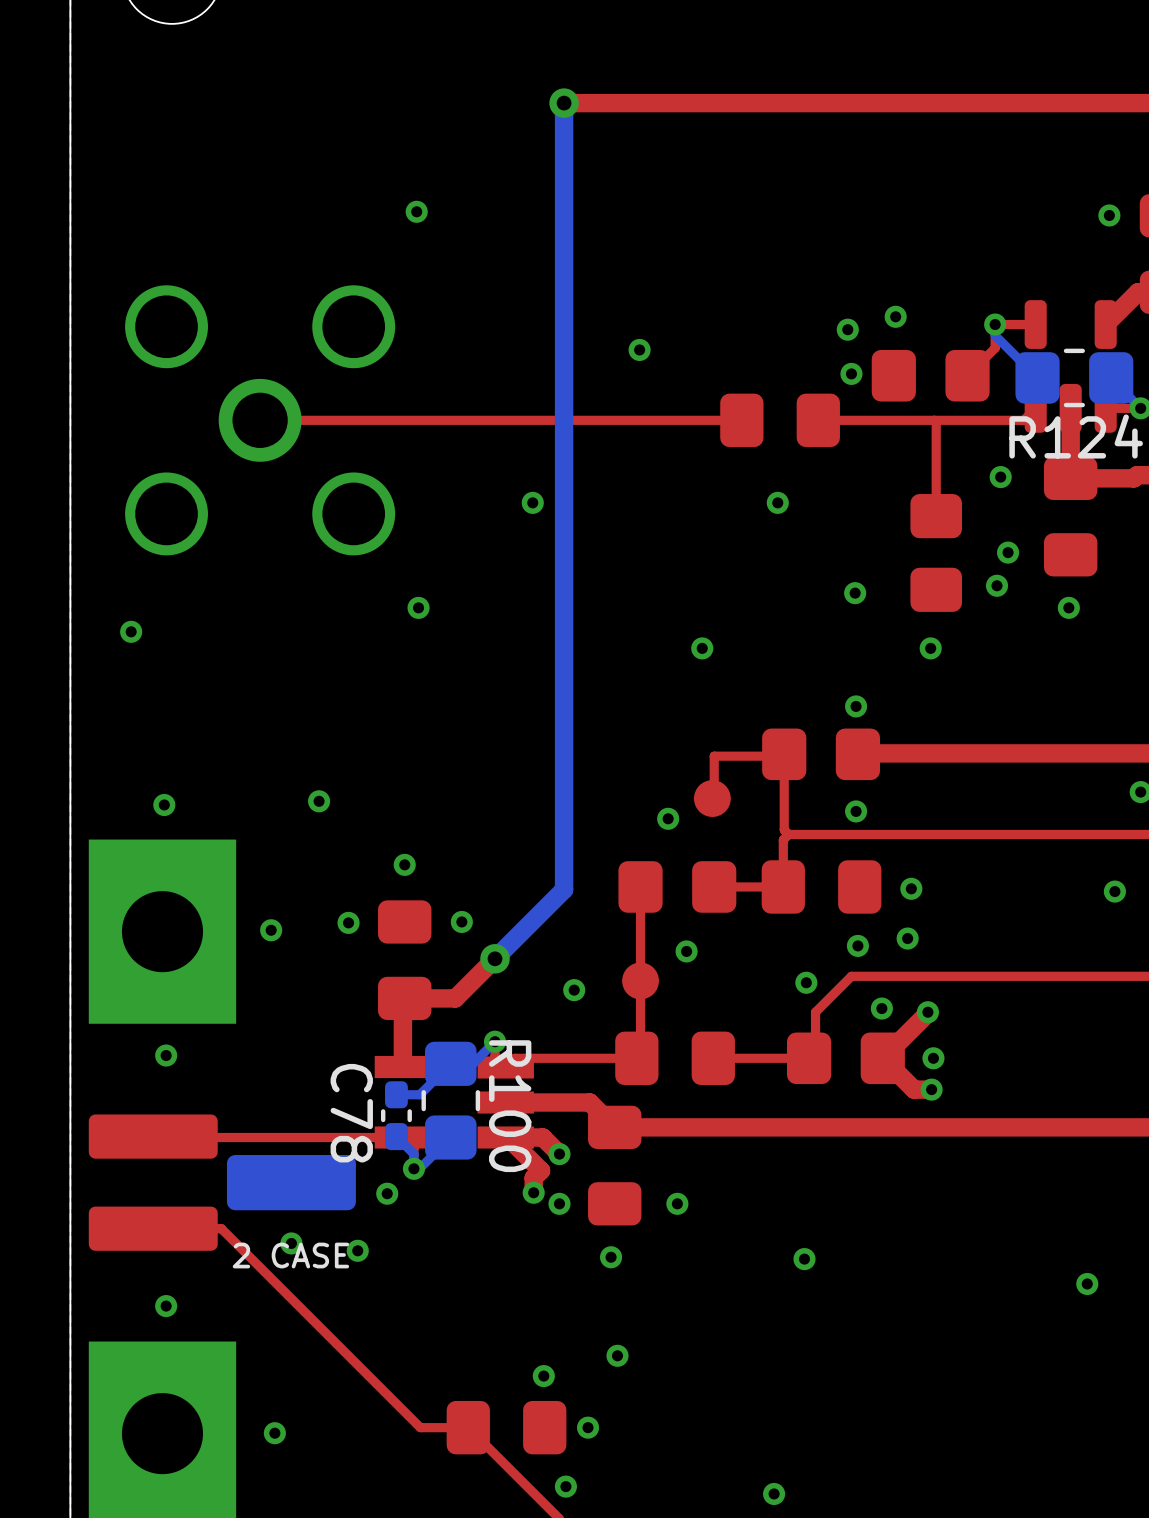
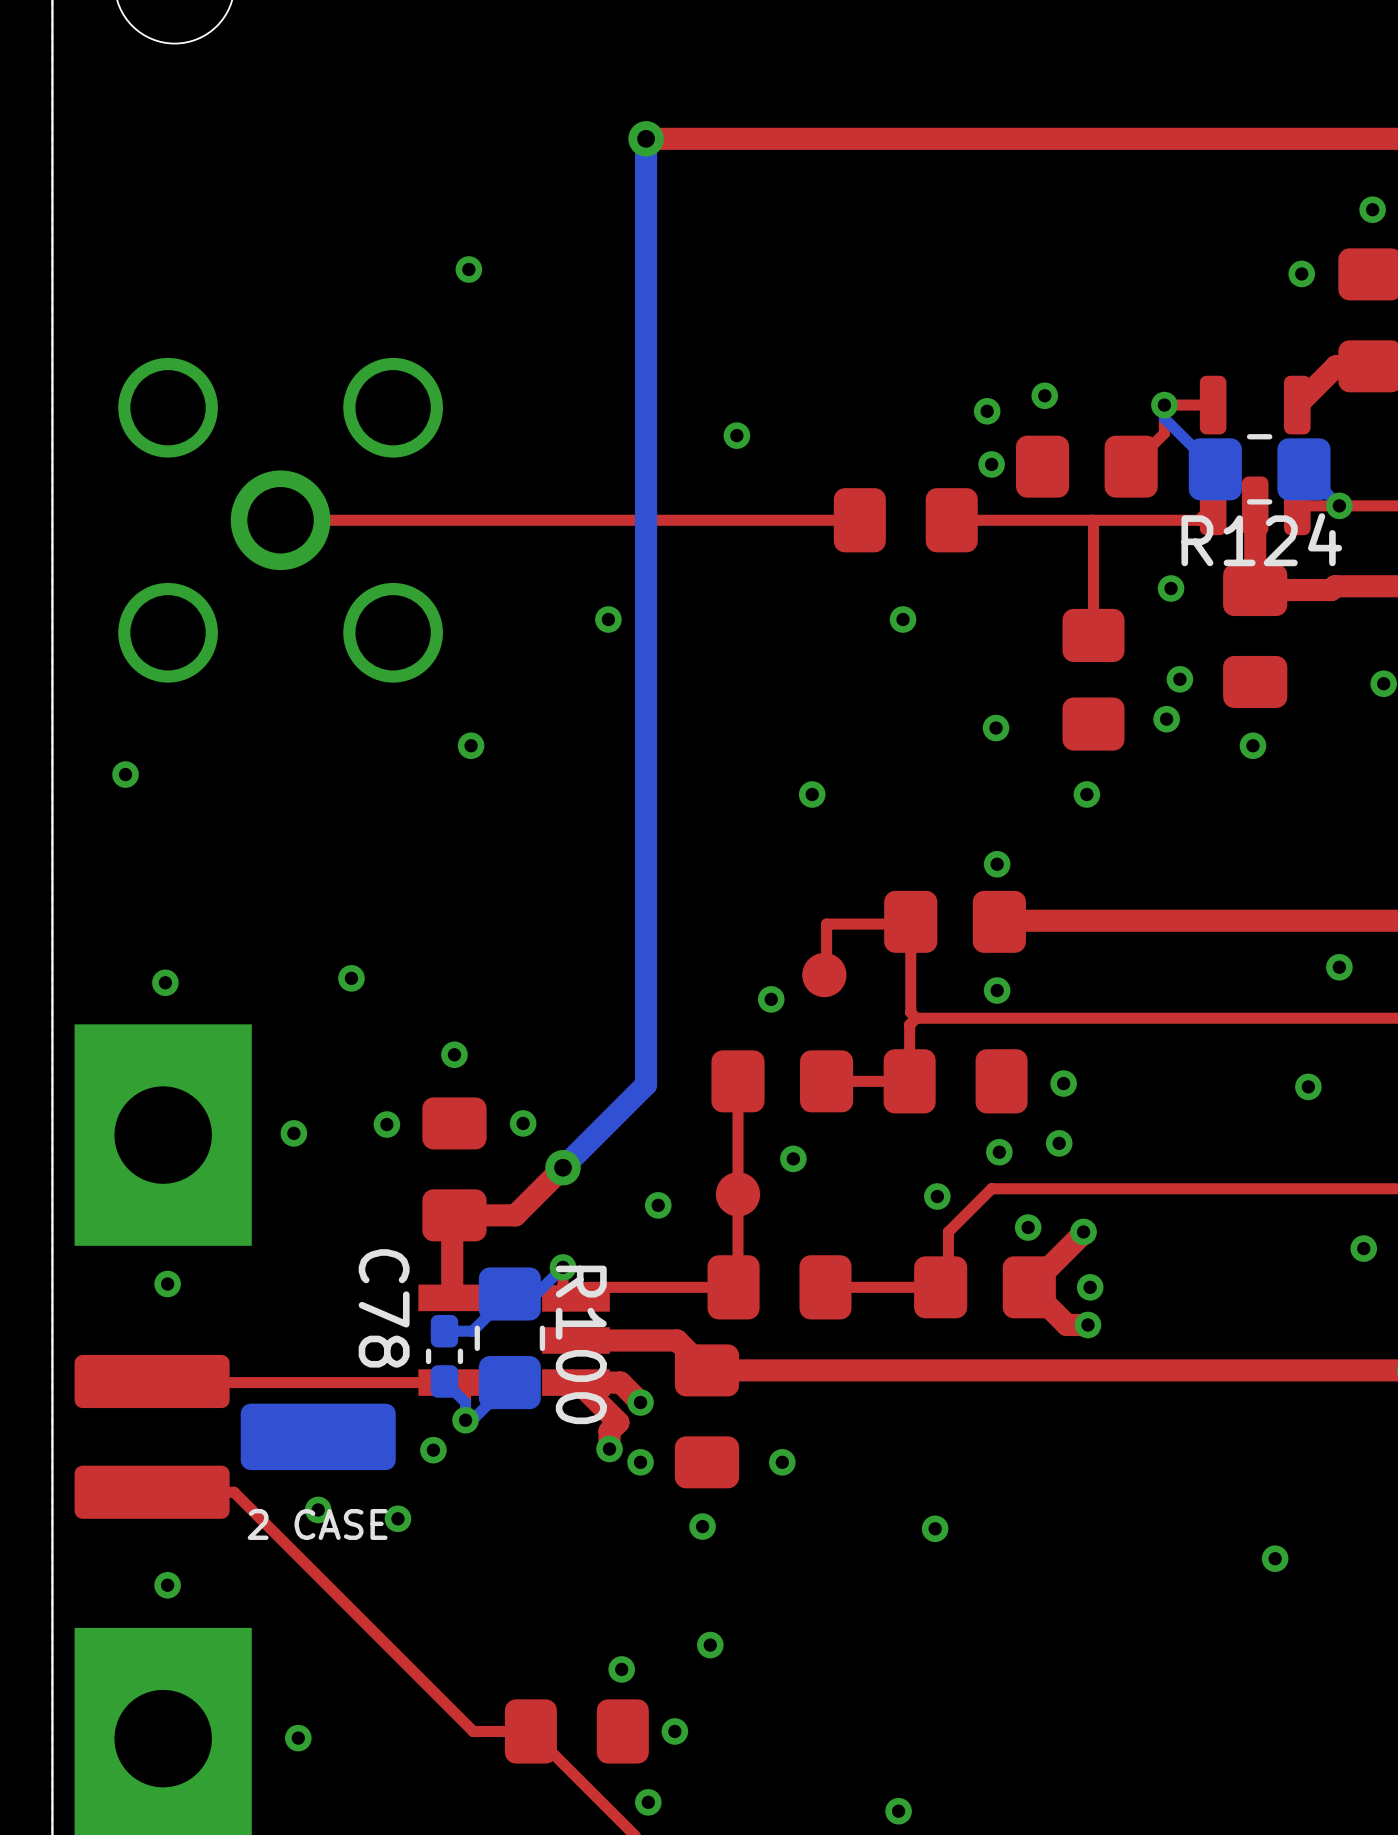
C78 name position: C78 (351, 1113) -> C78 (384, 1308)

